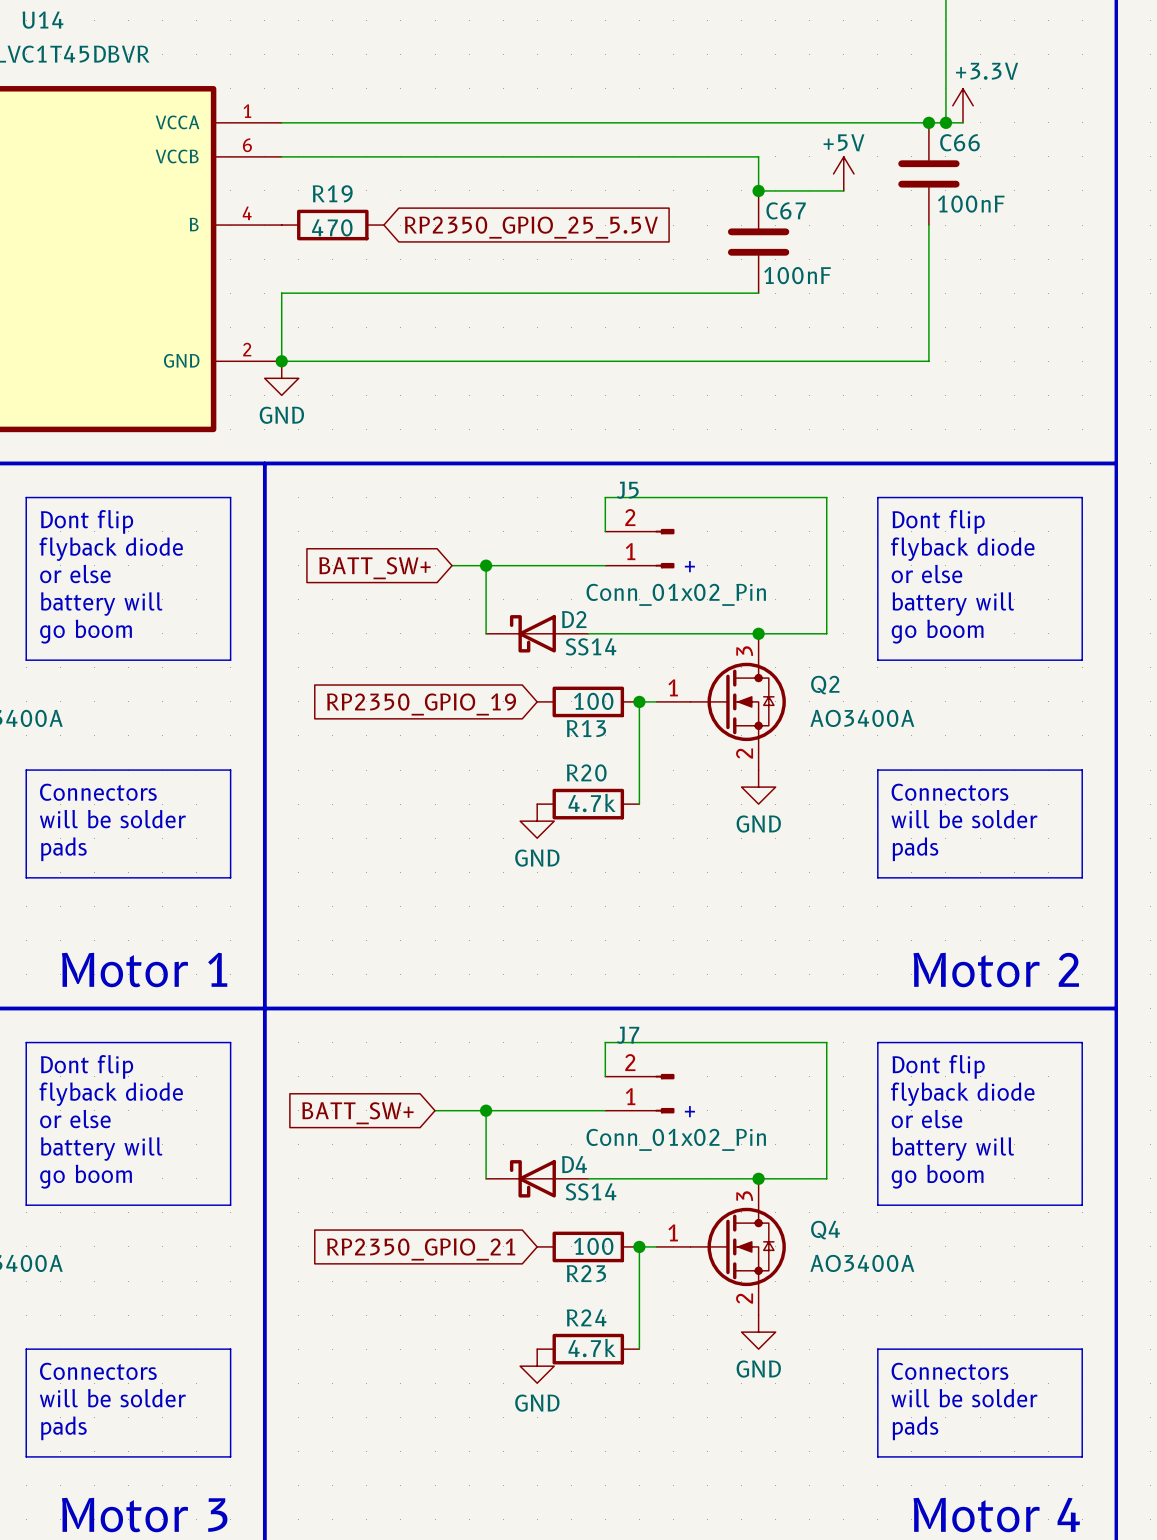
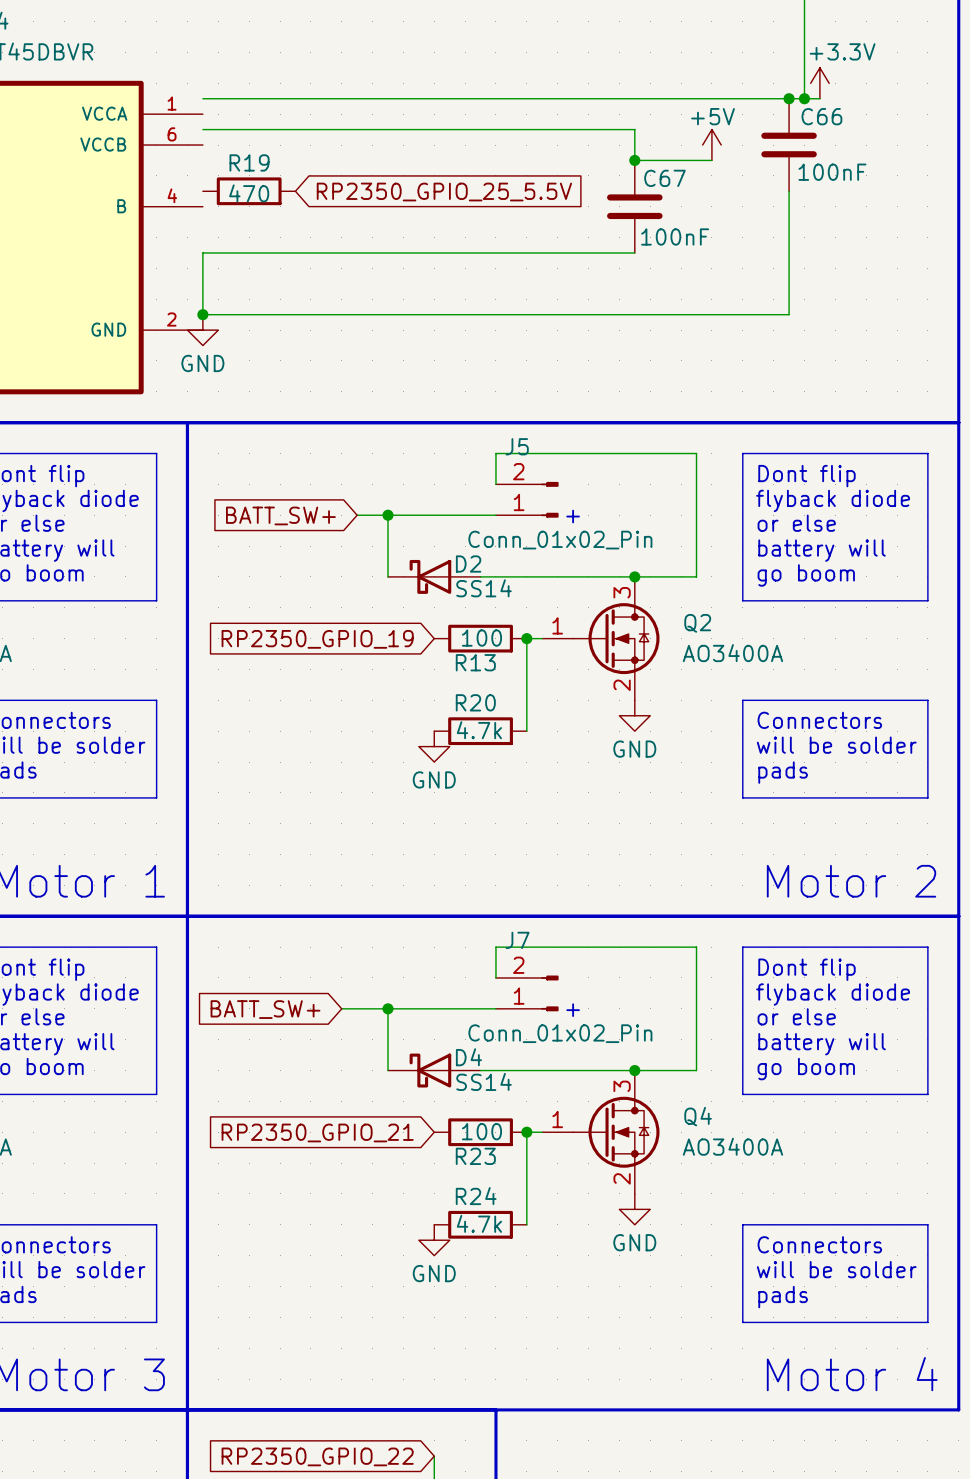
junction: none -> (789, 98)
junction: none -> (804, 98)
power symbol position: +3.3V (962, 105) -> +3.3V (819, 83)
wire: (281, 122) (962, 122) -> (202, 98) (819, 98)
junction: (928, 122) -> none
junction: (945, 122) -> none
wire: (281, 156) (758, 156) -> (202, 129) (634, 129) (634, 145)
wire: (758, 173) (758, 190) (843, 190) -> (634, 160) (711, 160)
power symbol position: +5V (843, 173) -> +5V (711, 145)
C66 position: (928, 173) -> (789, 145)
junction position: (758, 190) -> (634, 160)
R19 position: (332, 225) -> (249, 191)
global label position: RP2350_GPIO_25_5.5V (531, 227) -> RP2350_GPIO_25_5.5V (444, 192)
C67 position: (758, 242) -> (634, 206)
wire: (281, 293) (758, 293) -> (202, 268) (202, 252) (634, 252)
wire: (281, 344) (281, 361) (928, 361) (928, 344) -> (202, 314) (789, 314)
junction position: (281, 361) -> (202, 314)
power symbol position: GND (281, 378) -> GND (202, 330)

